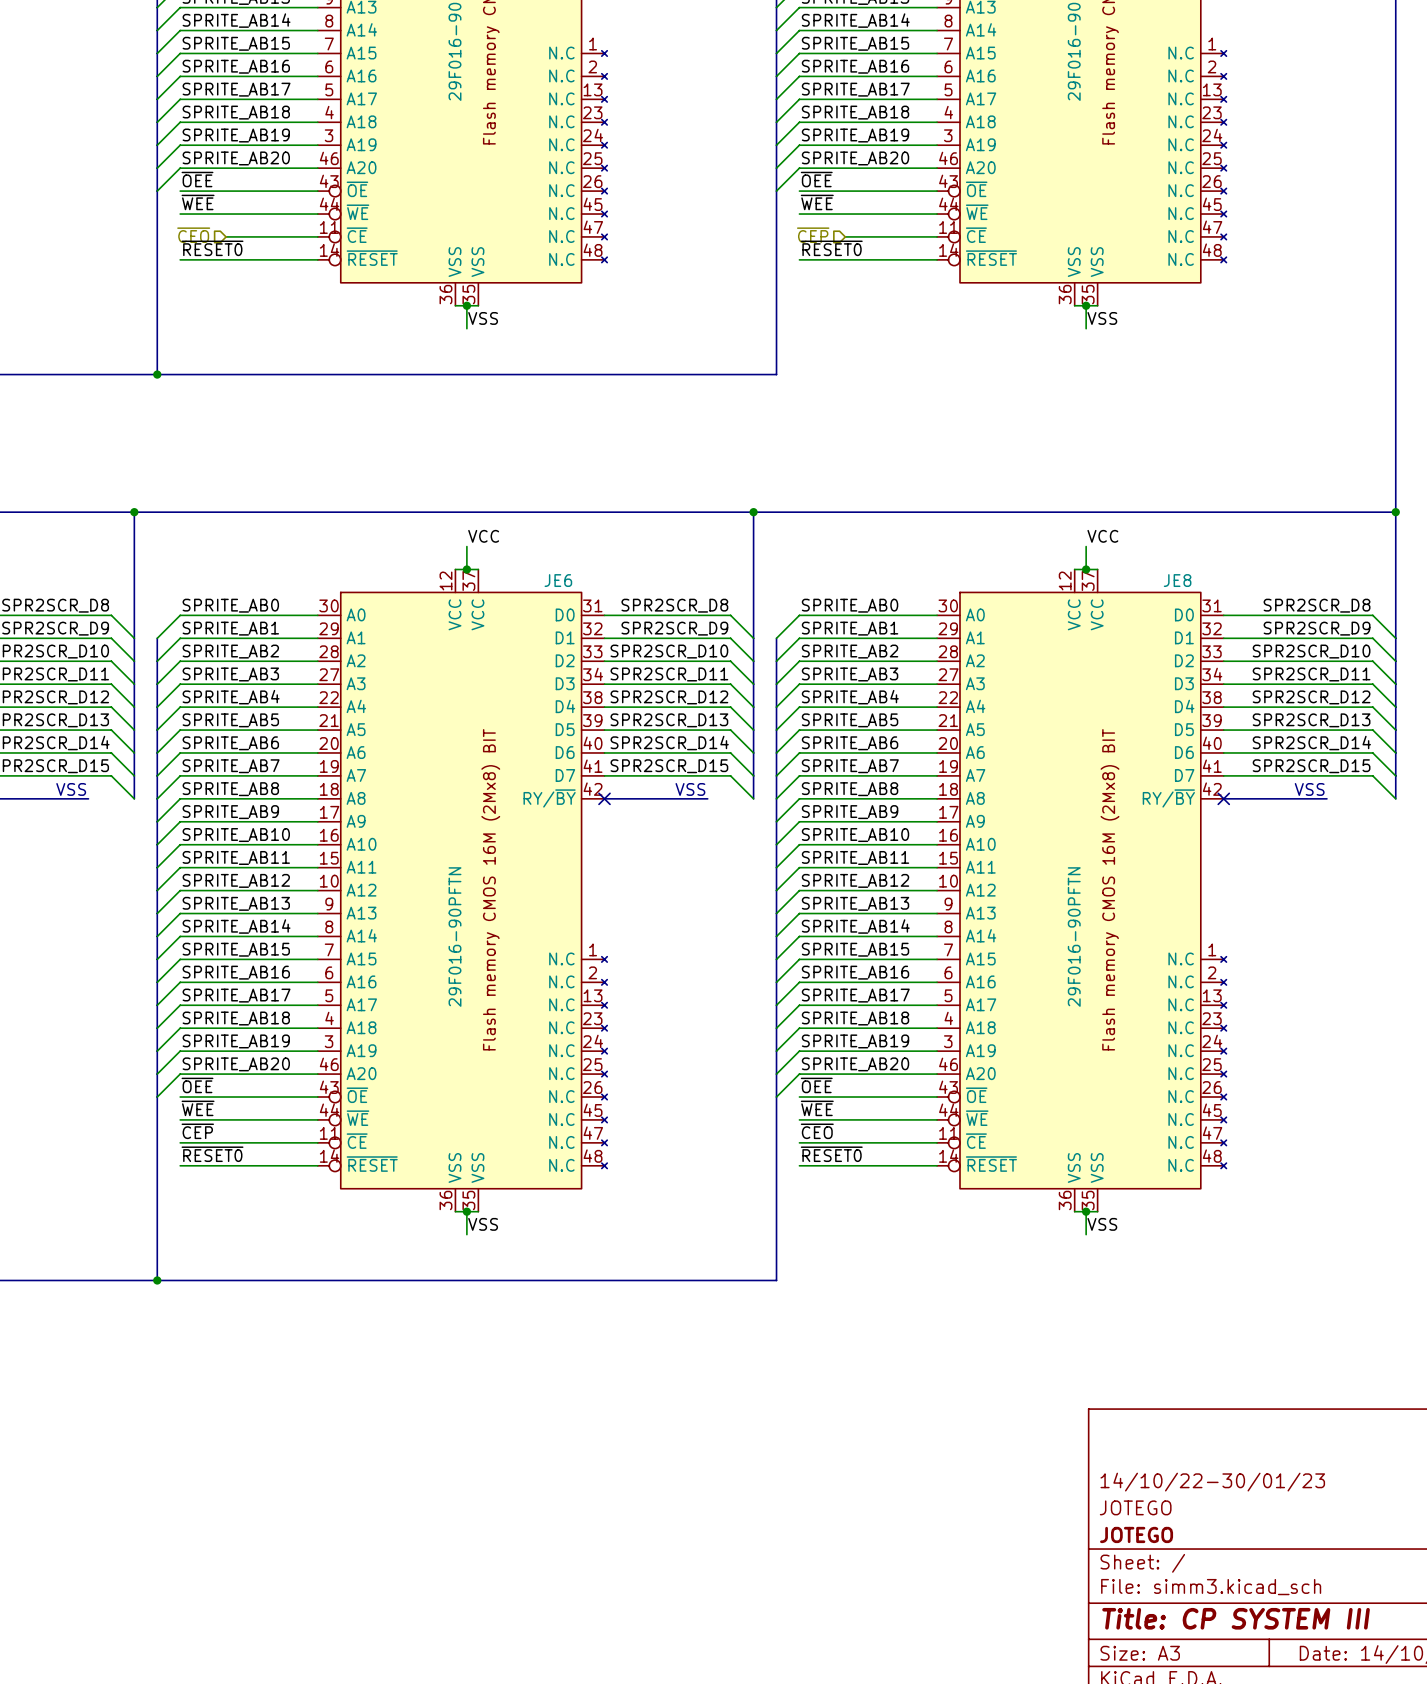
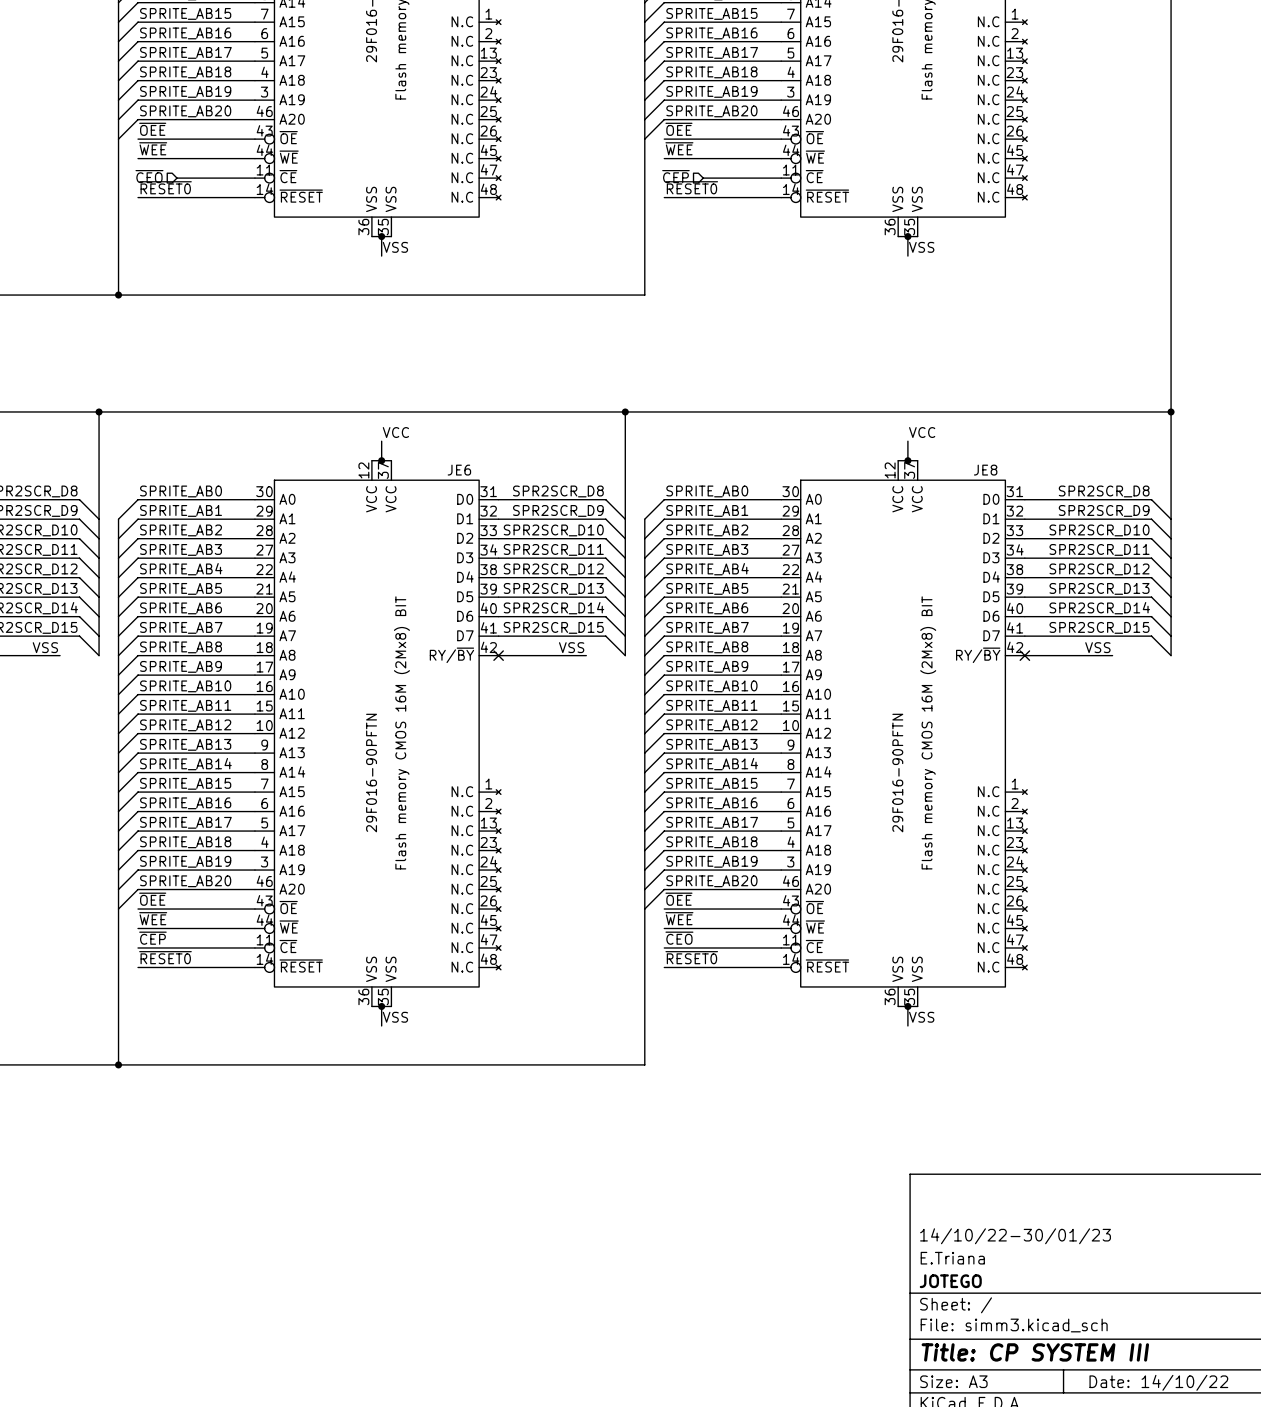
title block: JOTEGO (1135, 1507) -> E.Triana (952, 1258)

